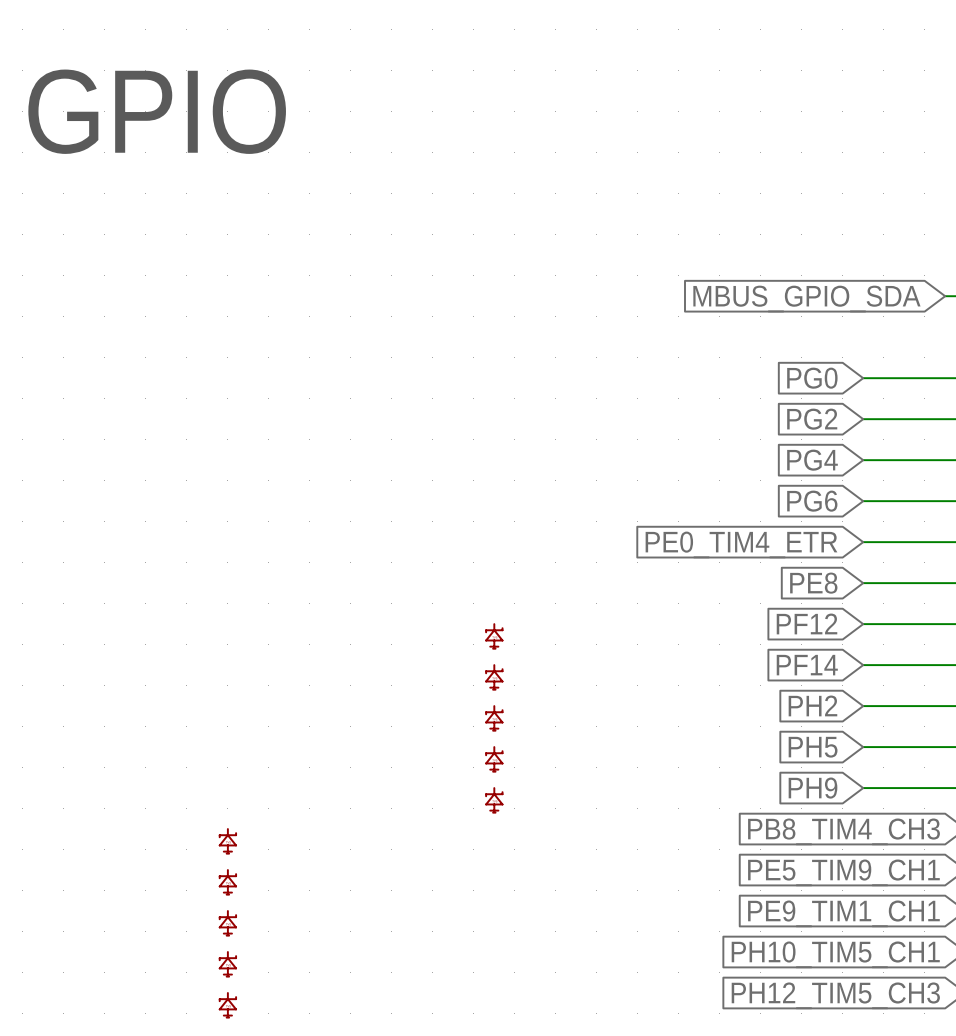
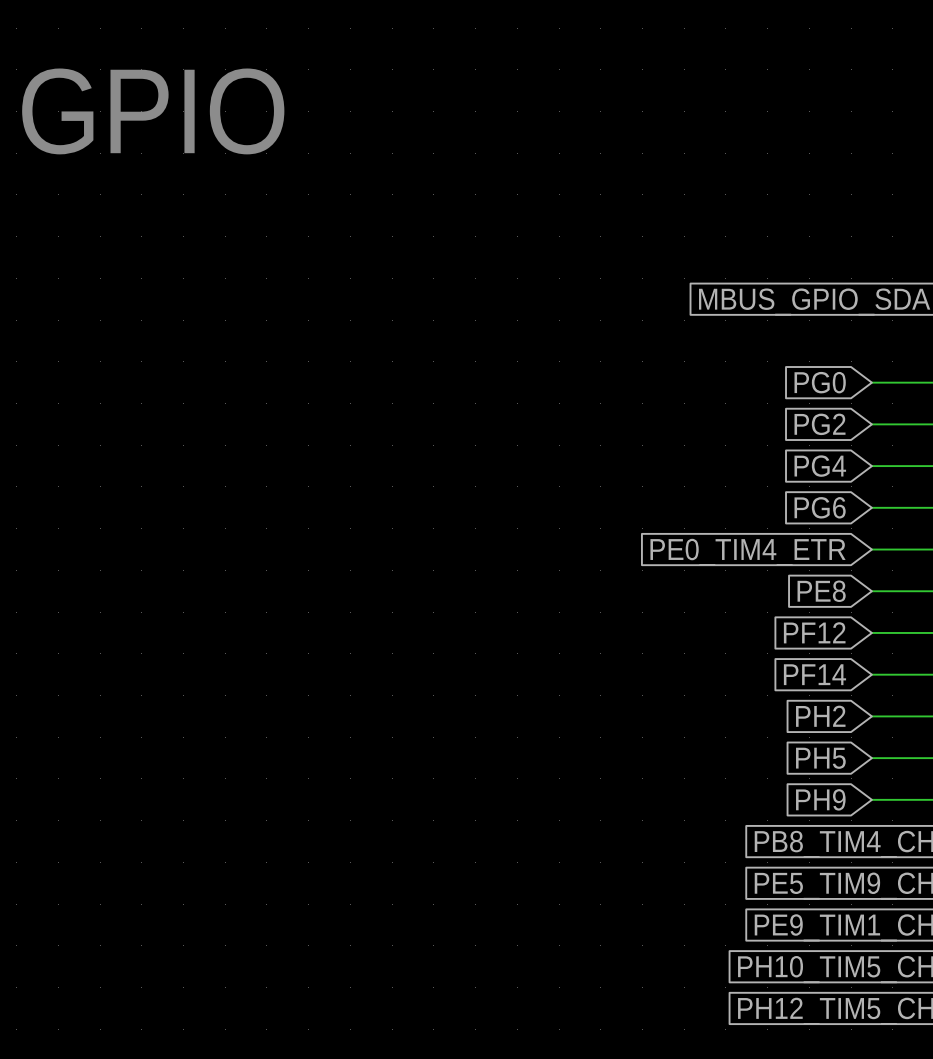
part: (494, 636) -> none
part: (494, 677) -> none
part: (494, 718) -> none
part: (494, 759) -> none
part: (494, 800) -> none
part: (227, 841) -> none
part: (227, 882) -> none
part: (227, 923) -> none
part: (227, 964) -> none
part: (227, 1005) -> none

